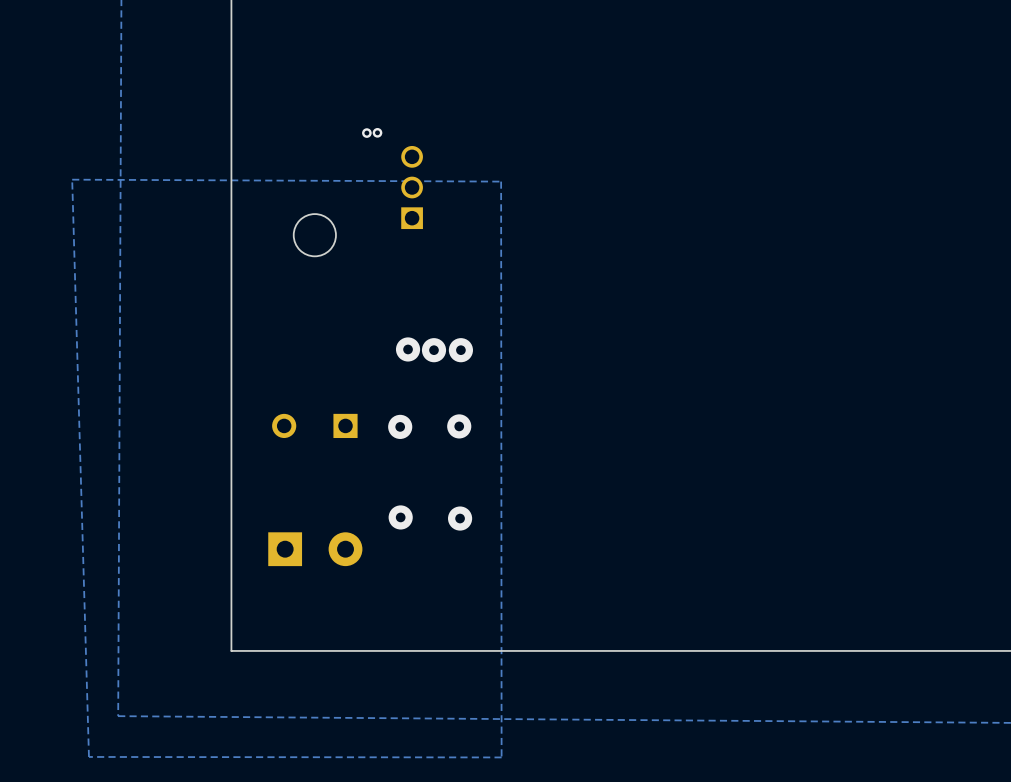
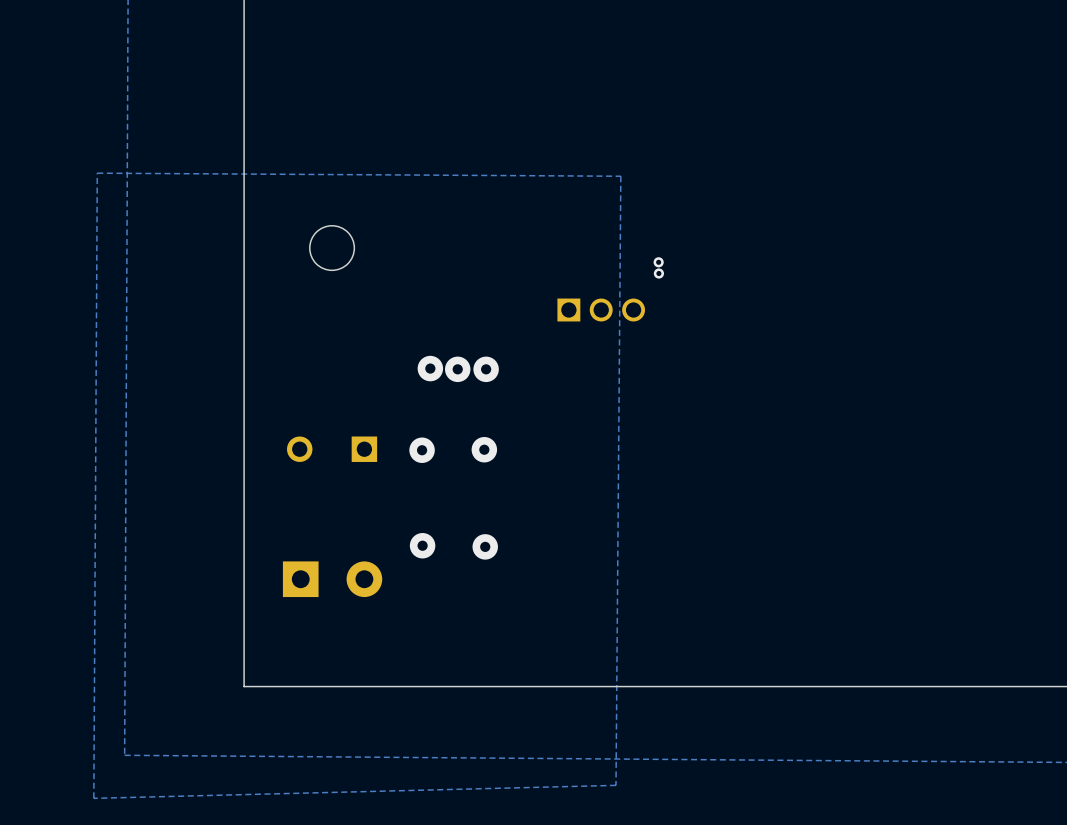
via: (377, 132) -> none
via: (366, 133) -> none
zone outline: (72, 179) (501, 181) (501, 757) (88, 756) (72, 179) -> (97, 173) (620, 176) (615, 785) (93, 798) (97, 173)
part rotation: 0° (412, 187) -> 90° clockwise (601, 310)
part position: (412, 187) -> (601, 310)
via: none -> (658, 262)
via: none -> (658, 273)

